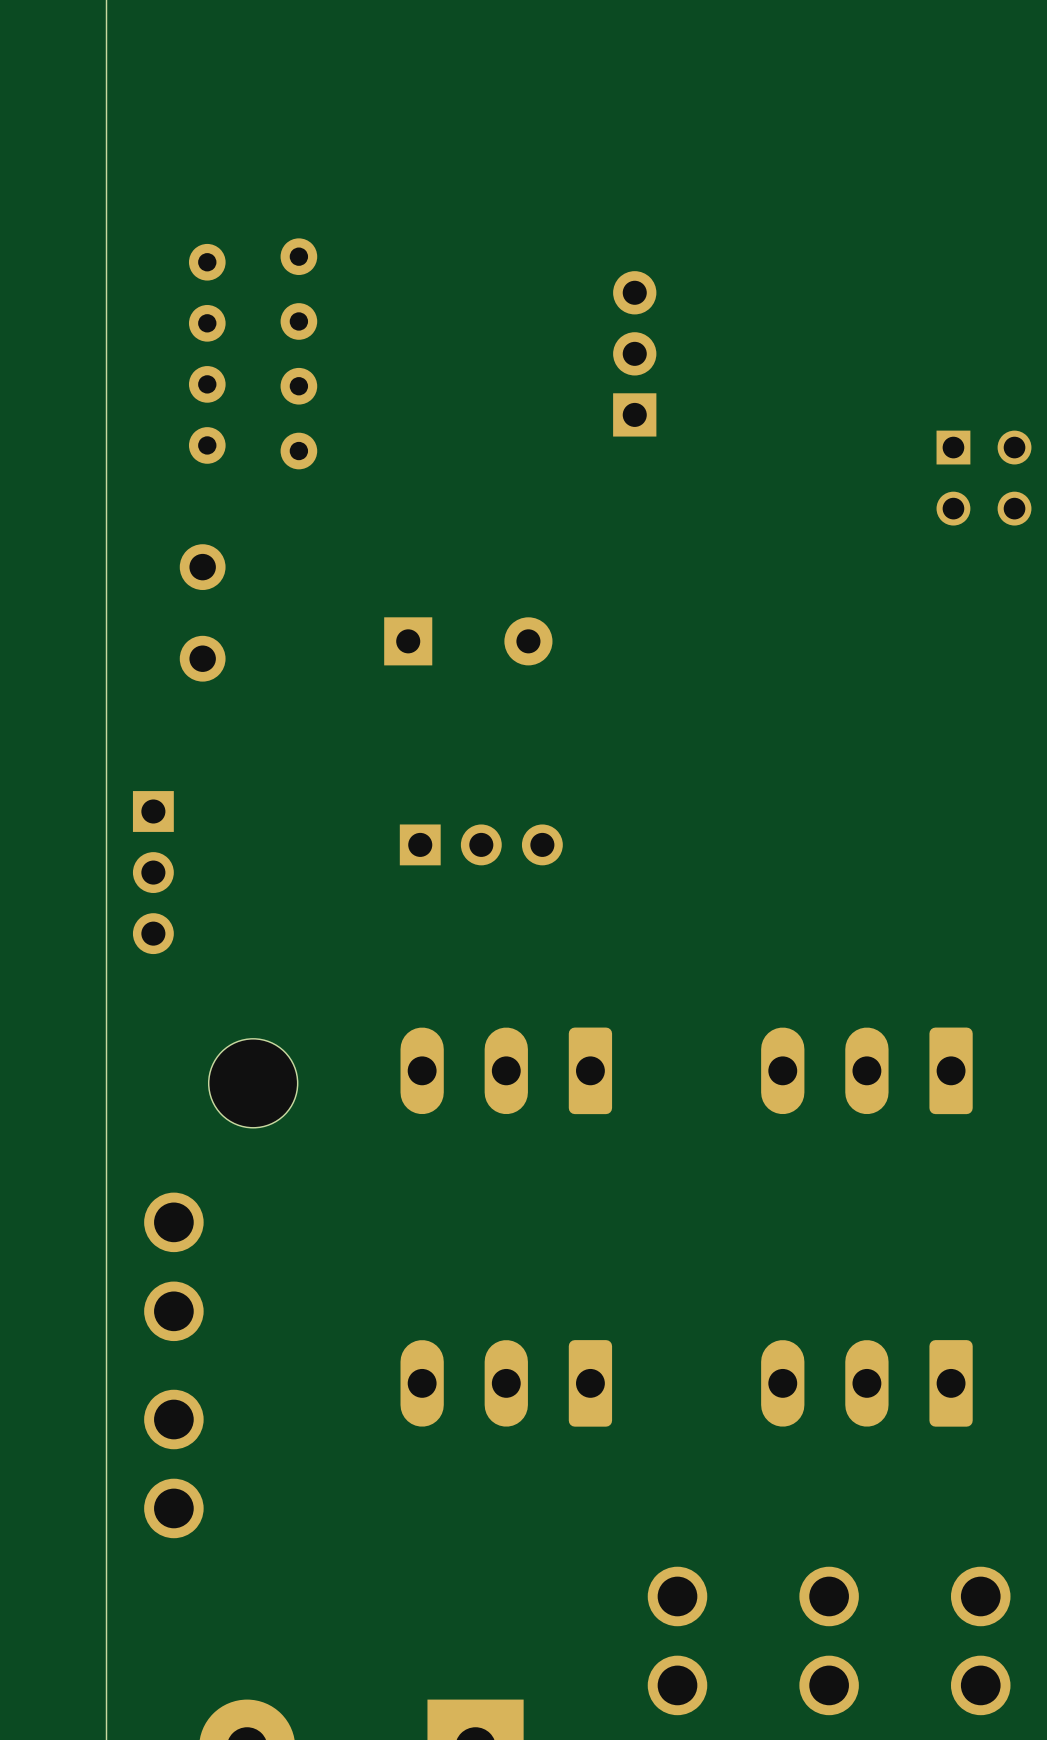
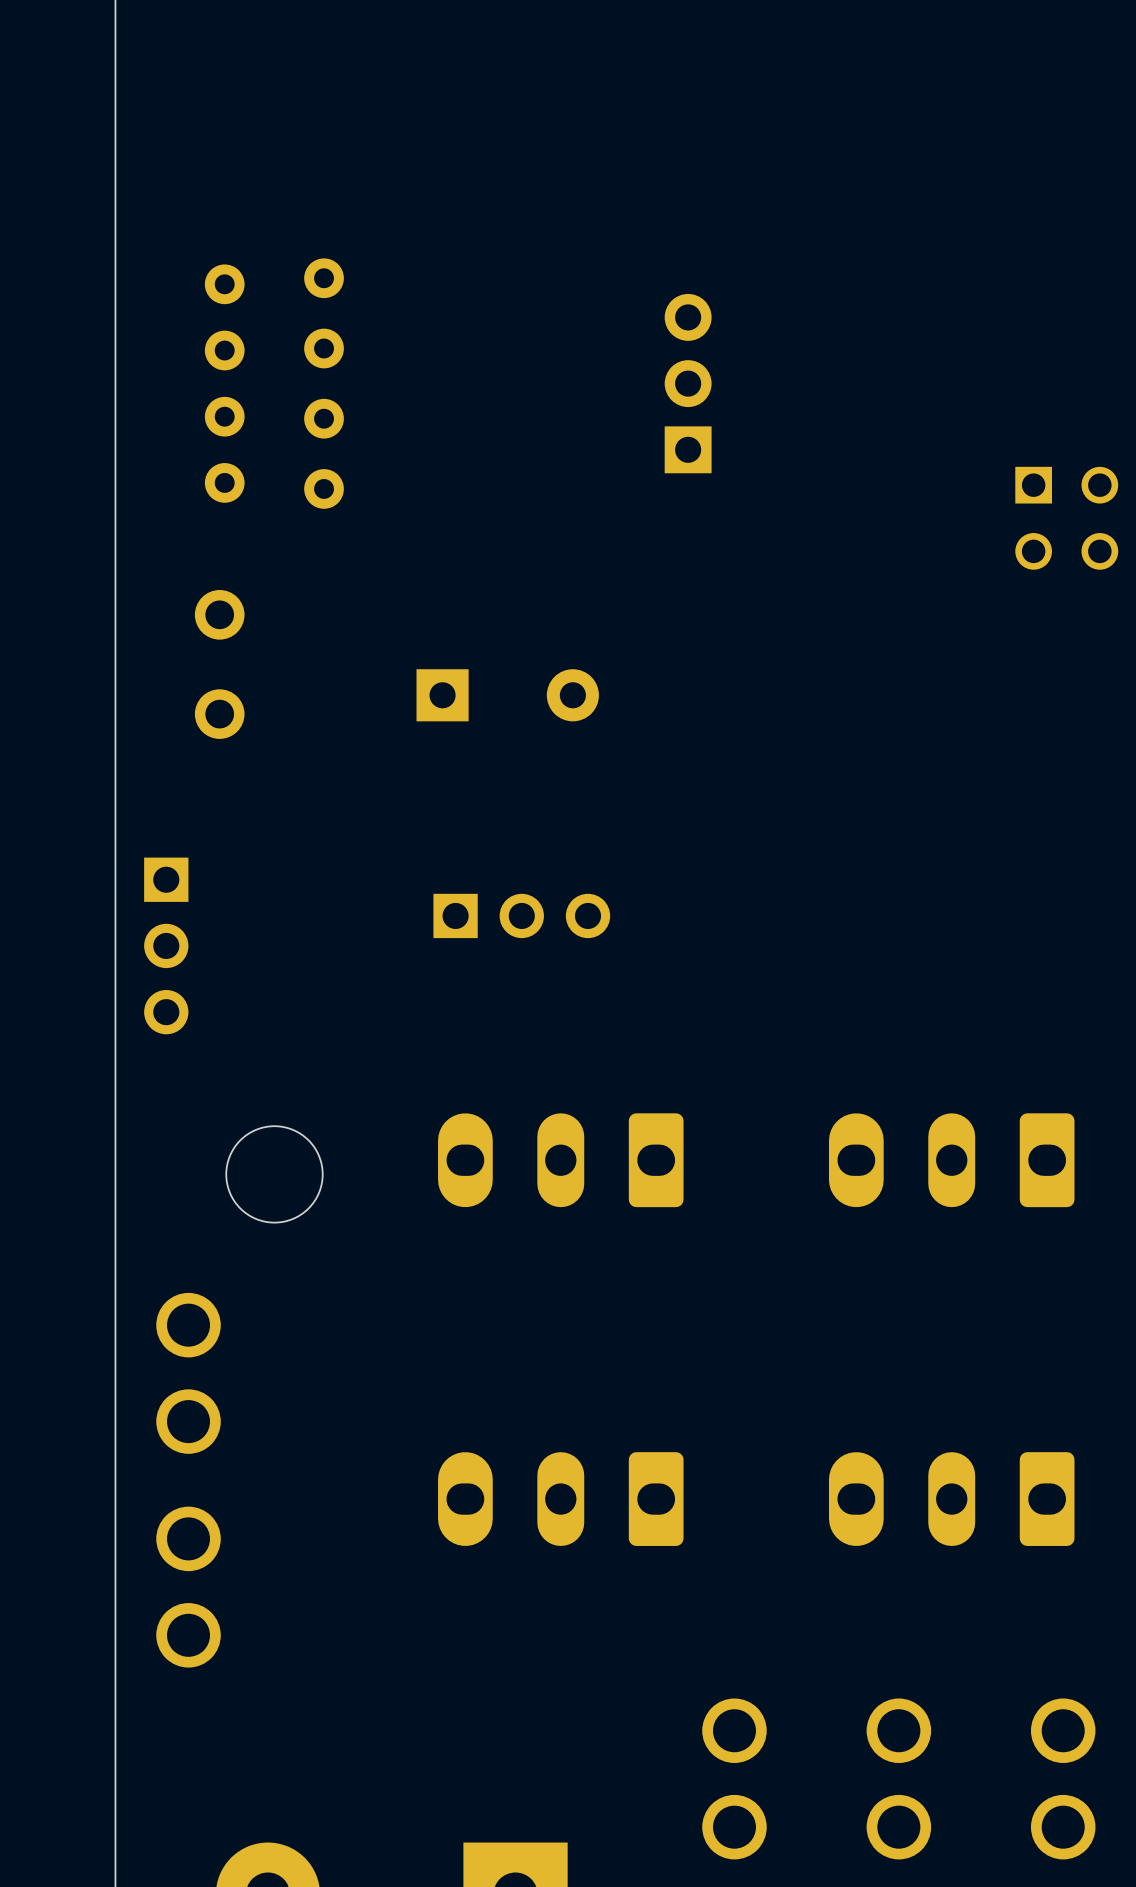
part footprint: [400, 1027, 613, 1115] -> [438, 1113, 684, 1208]
part footprint: [761, 1027, 973, 1115] -> [828, 1113, 1075, 1208]
part footprint: [400, 1340, 613, 1427] -> [438, 1452, 684, 1546]
part footprint: [761, 1340, 973, 1427] -> [828, 1452, 1075, 1546]

